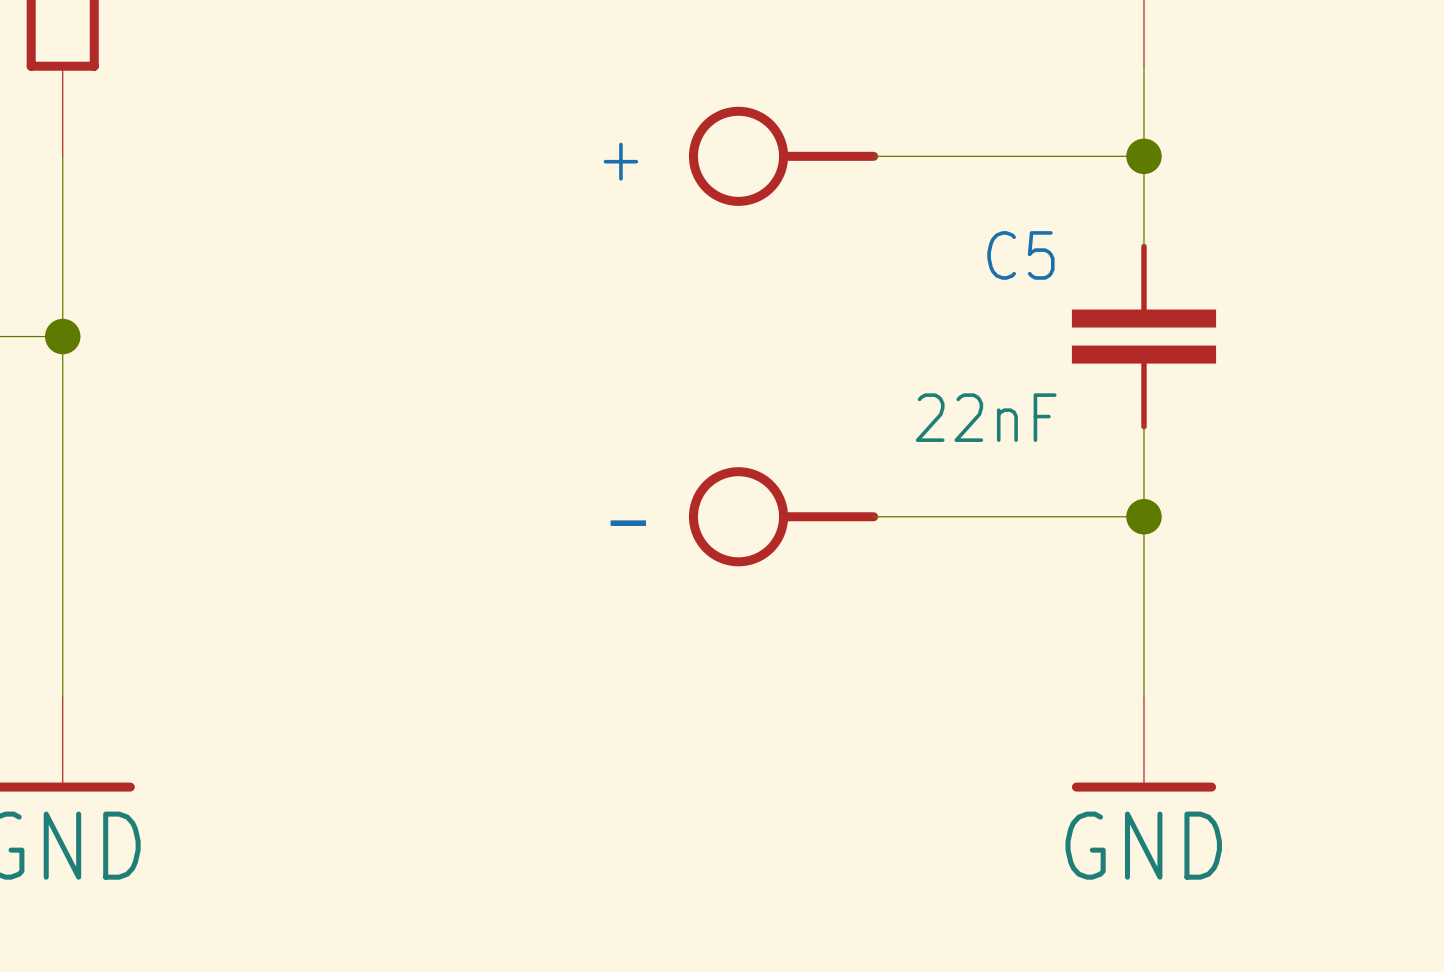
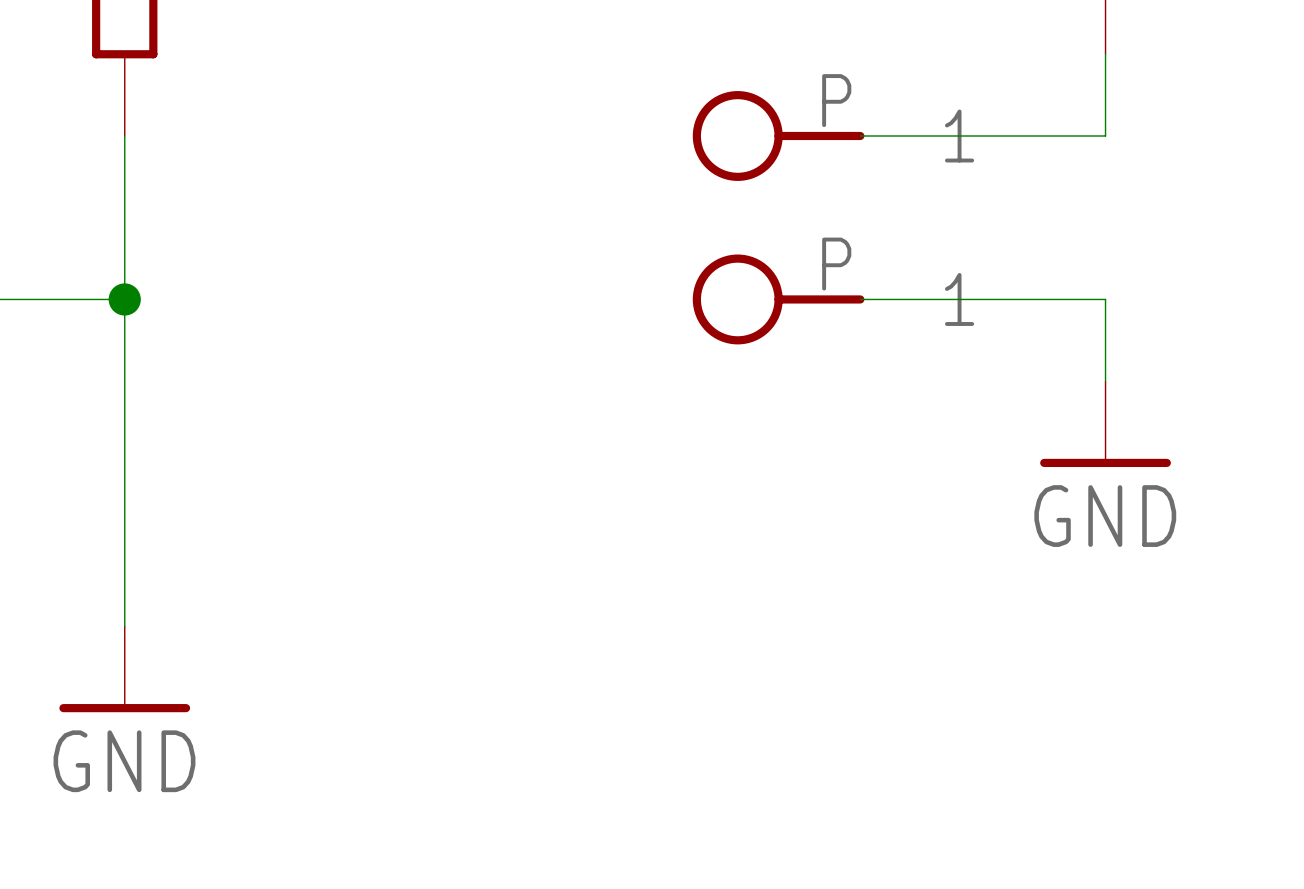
part pin number: none -> P (836, 100)
part pin name: none -> 1 (959, 135)
wire: (1143, 156) (1143, 246) -> none
junction: (1143, 156) -> none
part name: + (620, 161) -> none
part: none -> (778, 299)
C5: 22nF (1143, 336) -> none
wire: (1143, 426) (1143, 696) -> (1105, 381) (1105, 299) (860, 299)
part: (783, 516) -> none
wire: (873, 516) (1143, 516) -> none
junction: (1143, 516) -> none
power symbol position: GND (1143, 744) -> GND (1105, 424)

